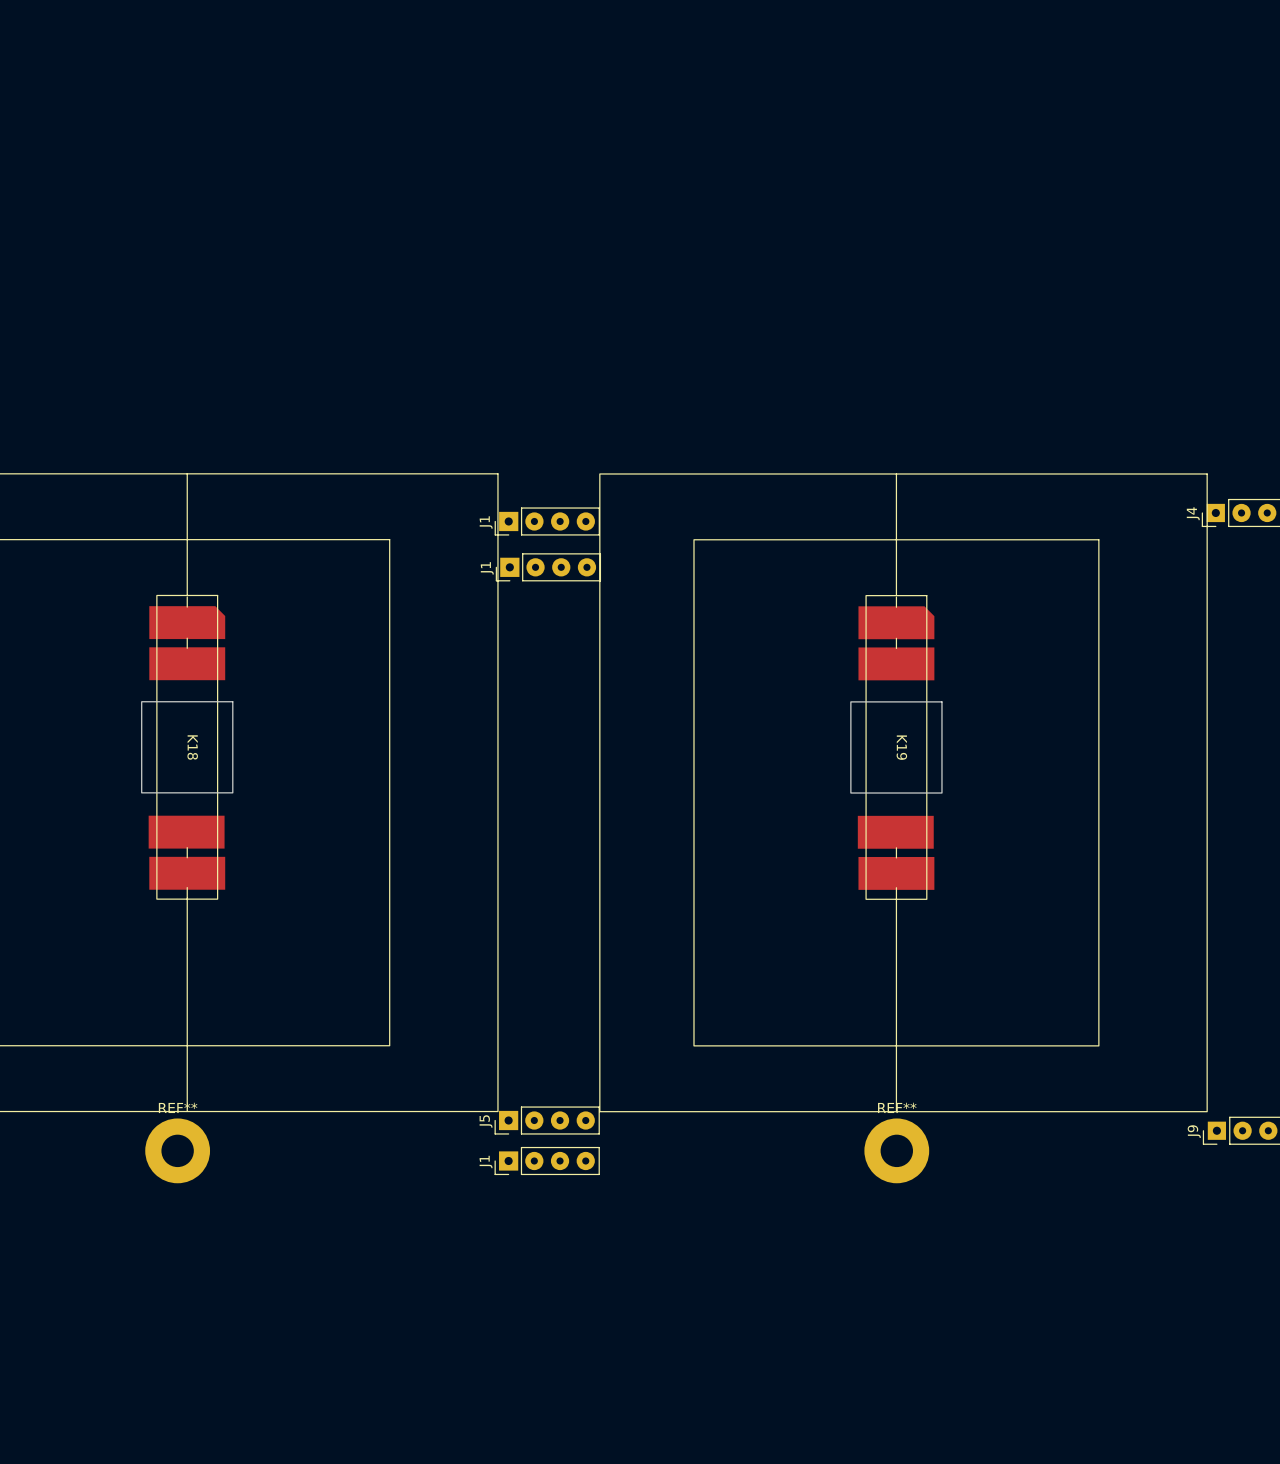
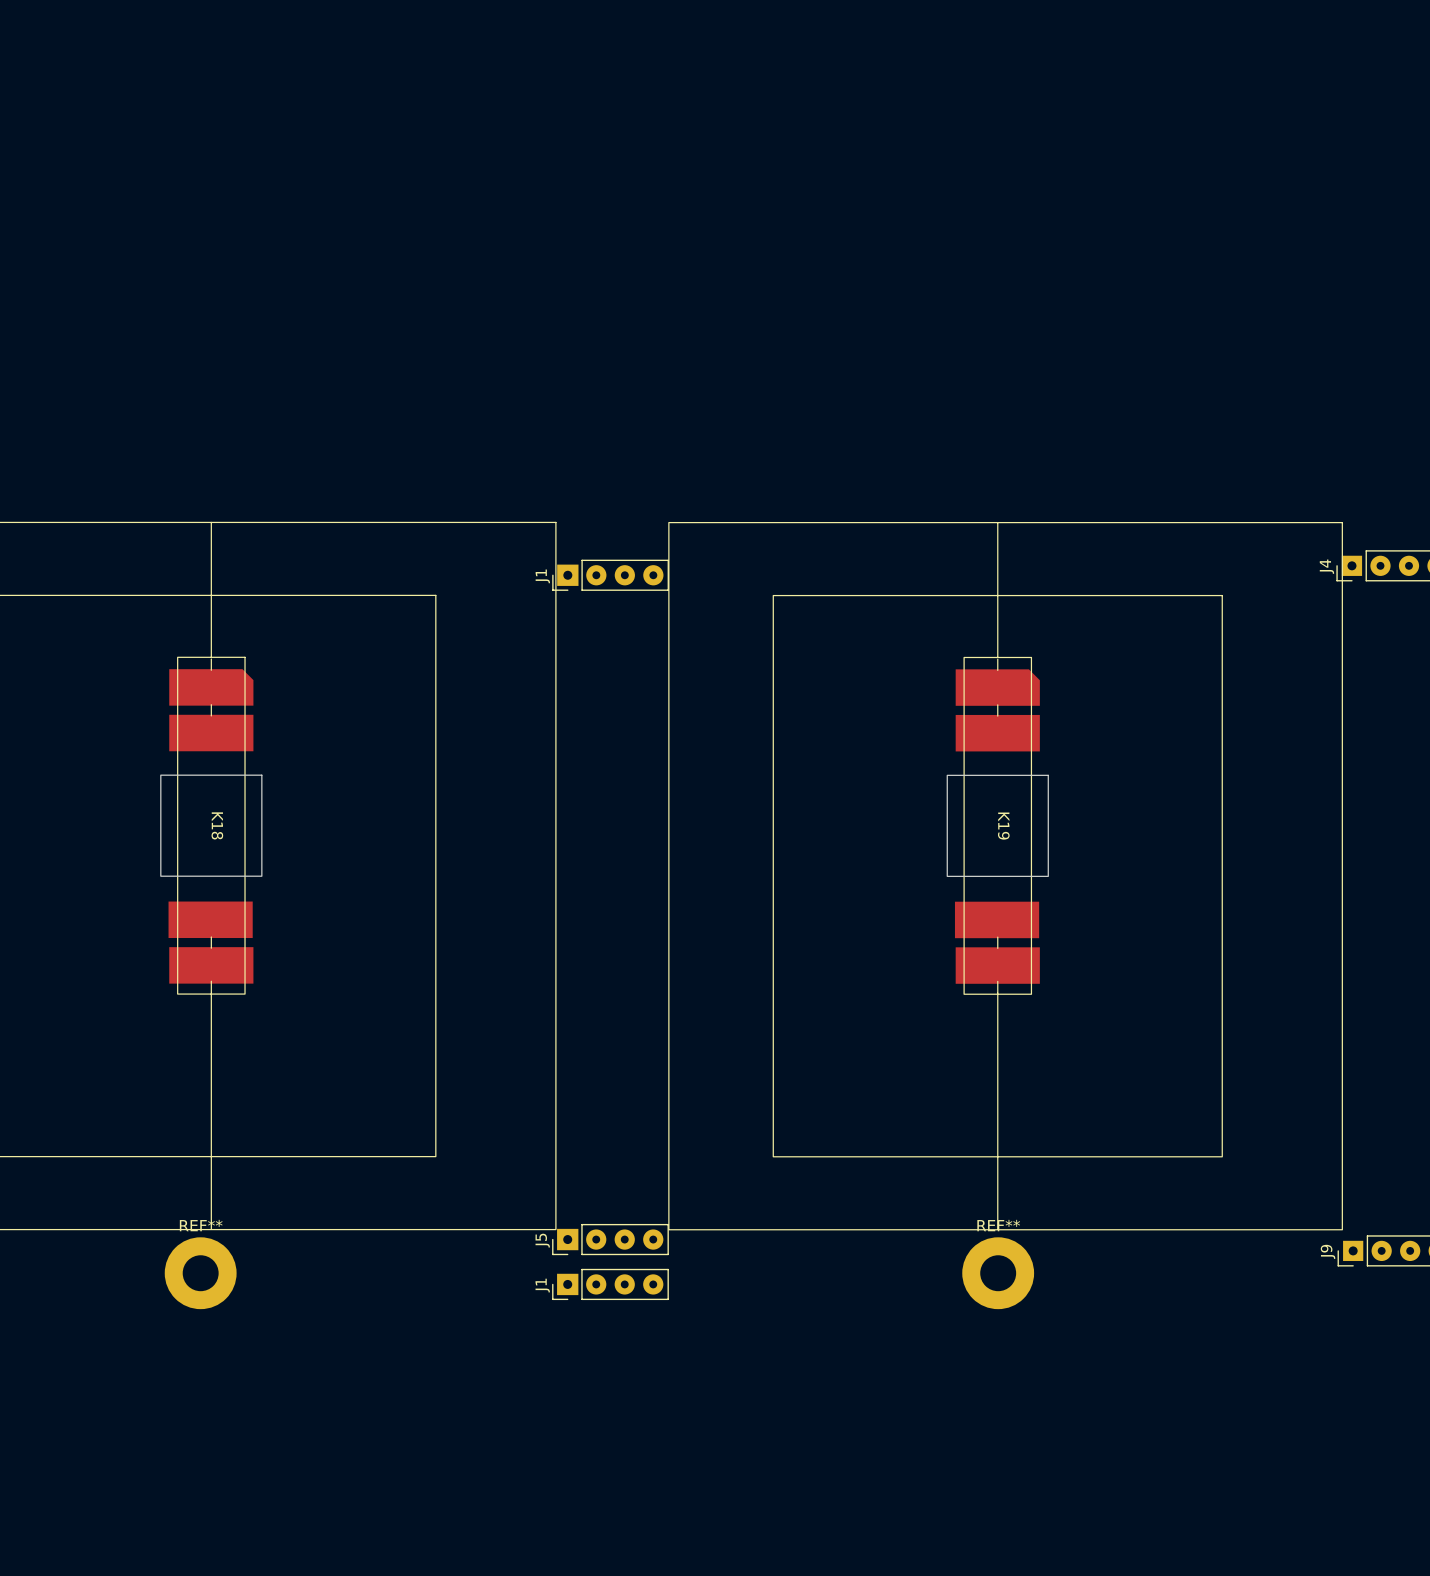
J1: (548, 567) -> none

